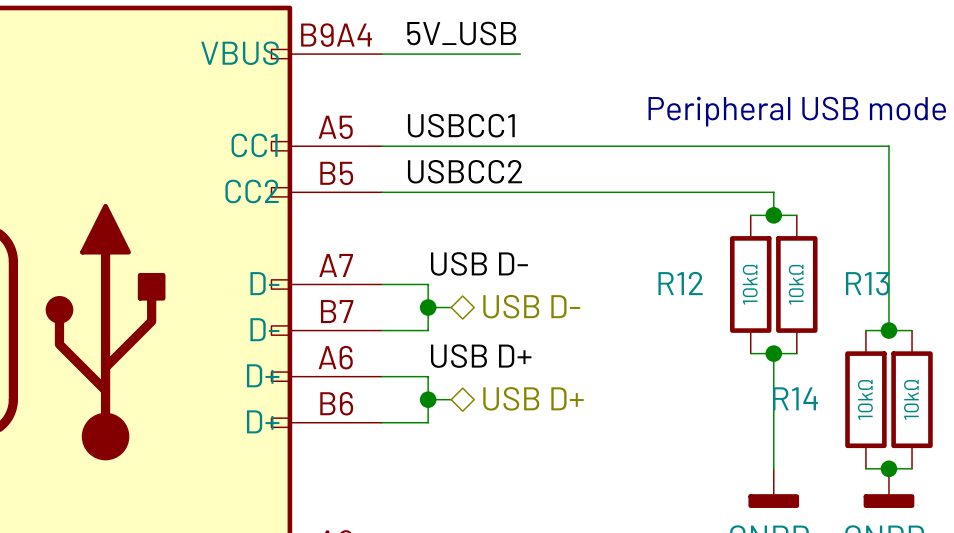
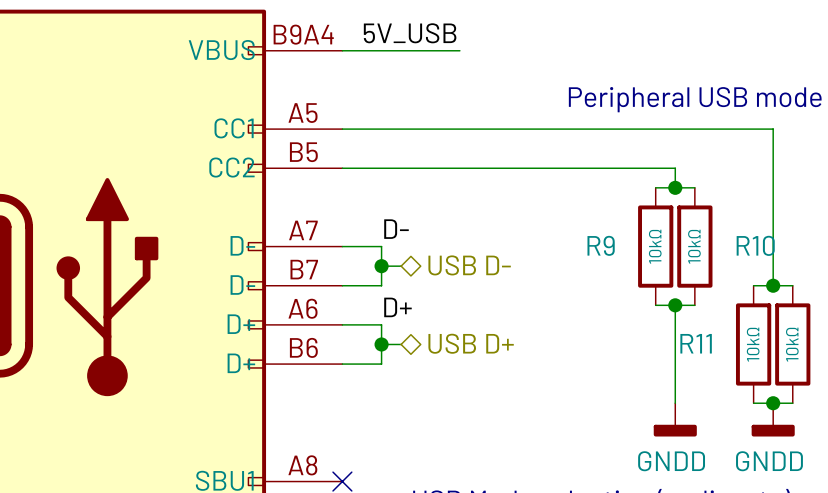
label: USBCC1 (461, 125) -> none
label: USBCC2 (464, 171) -> none
label: USB D- (479, 263) -> D- (396, 229)
R12 name: R12 (680, 283) -> R9 (601, 245)
R13 name: R13 (867, 283) -> R10 (755, 245)
label: USB D+ (481, 356) -> D+ (397, 307)
R14 name: R14 (795, 398) -> R11 (696, 343)

